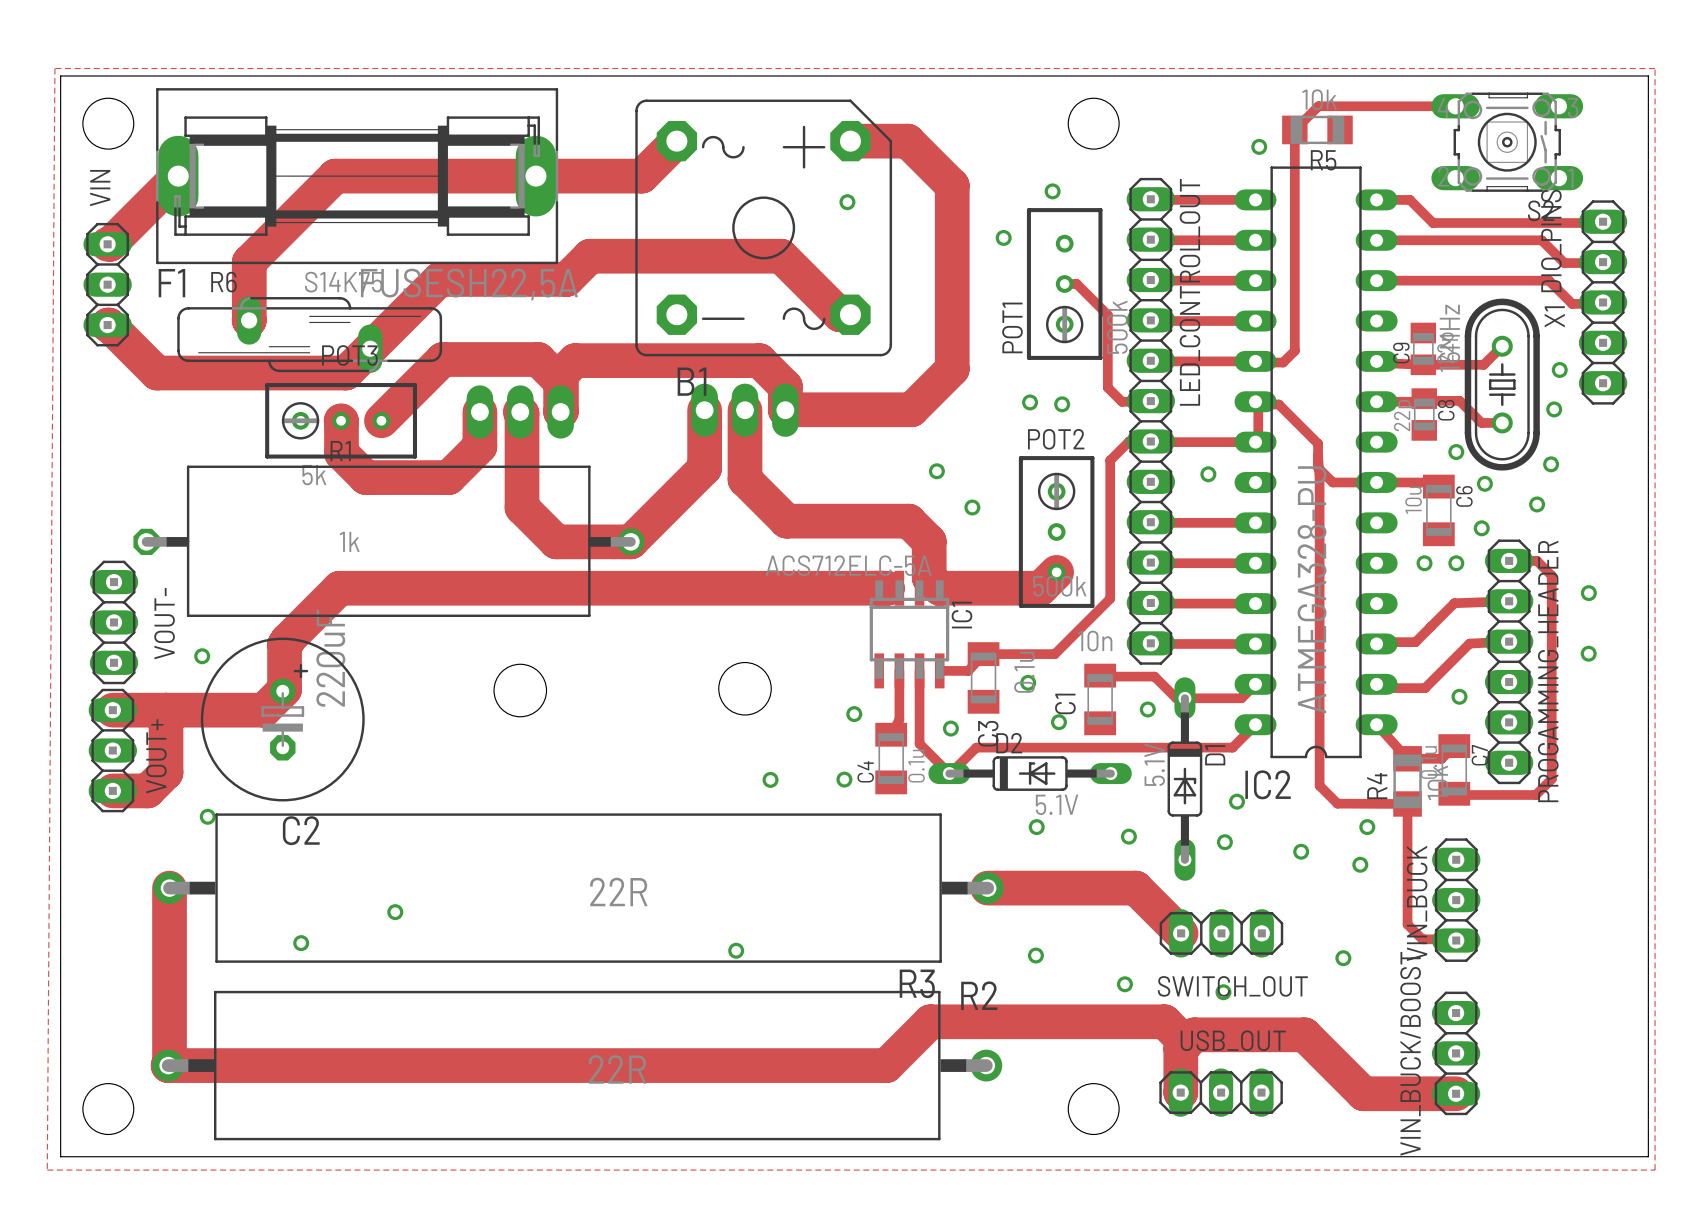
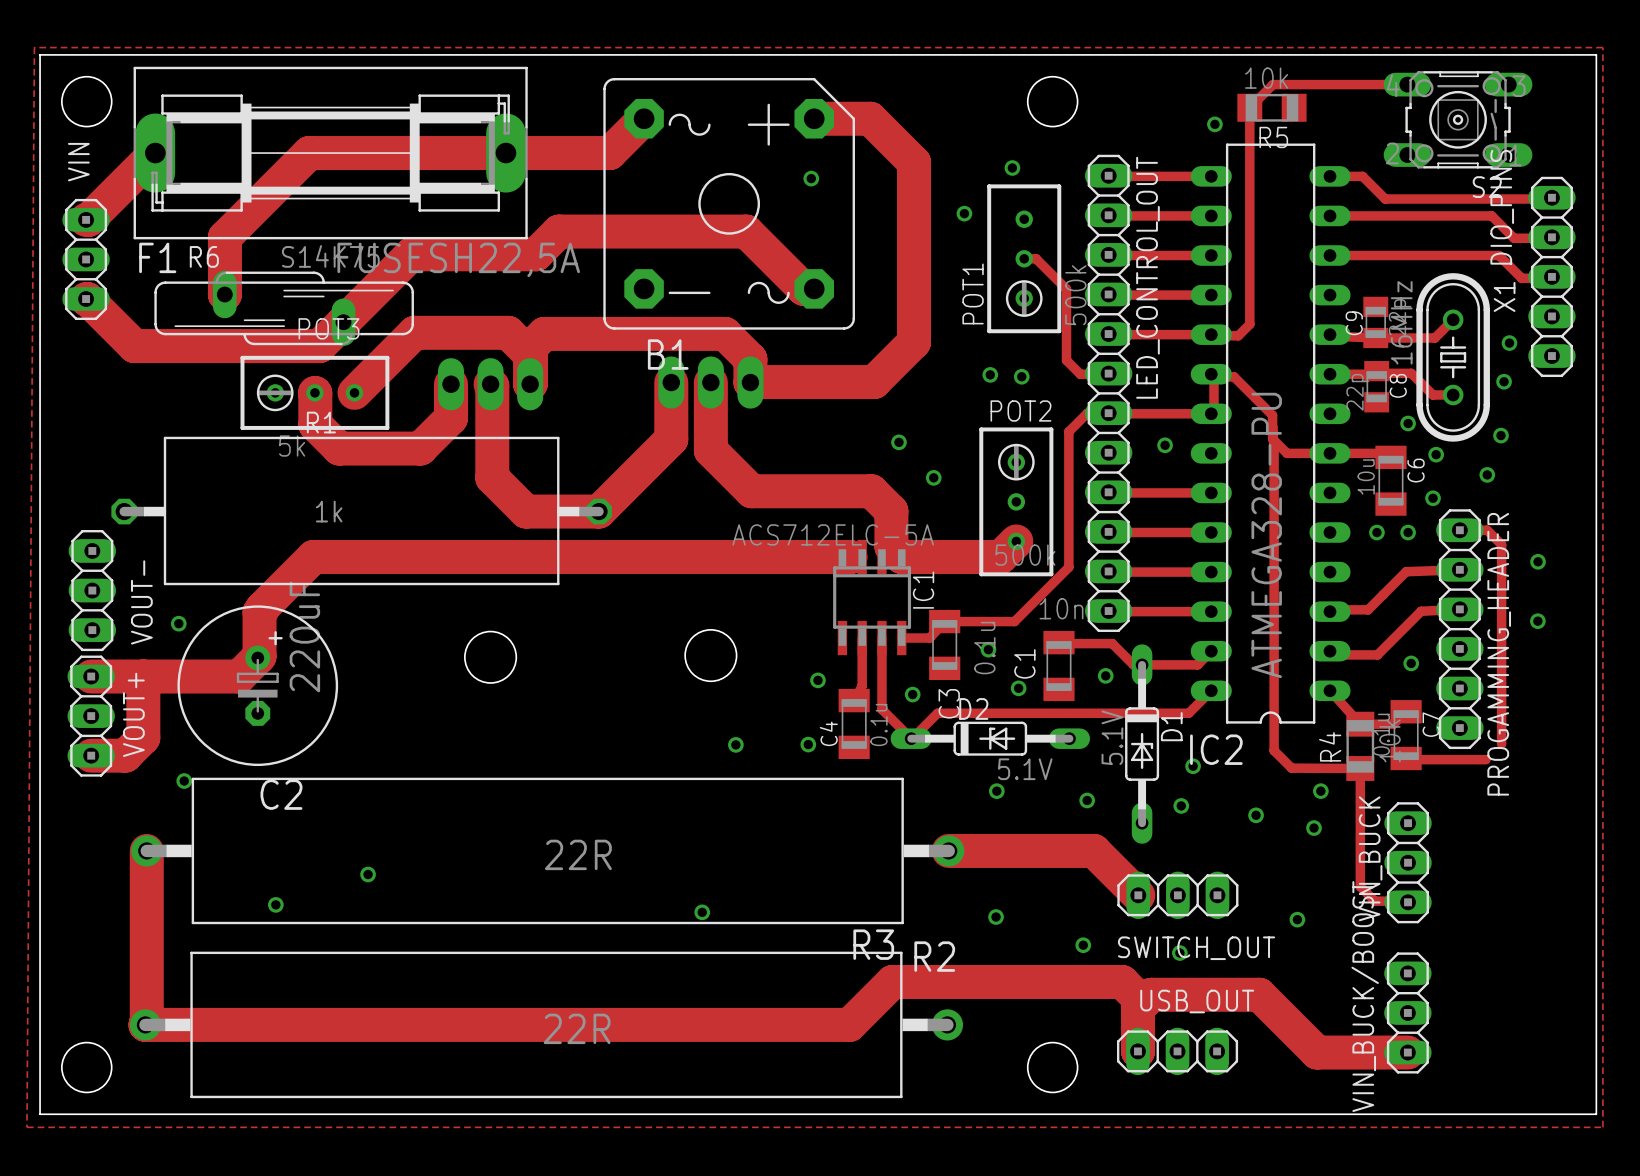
track: (1551, 779) (1535, 795) -> none

